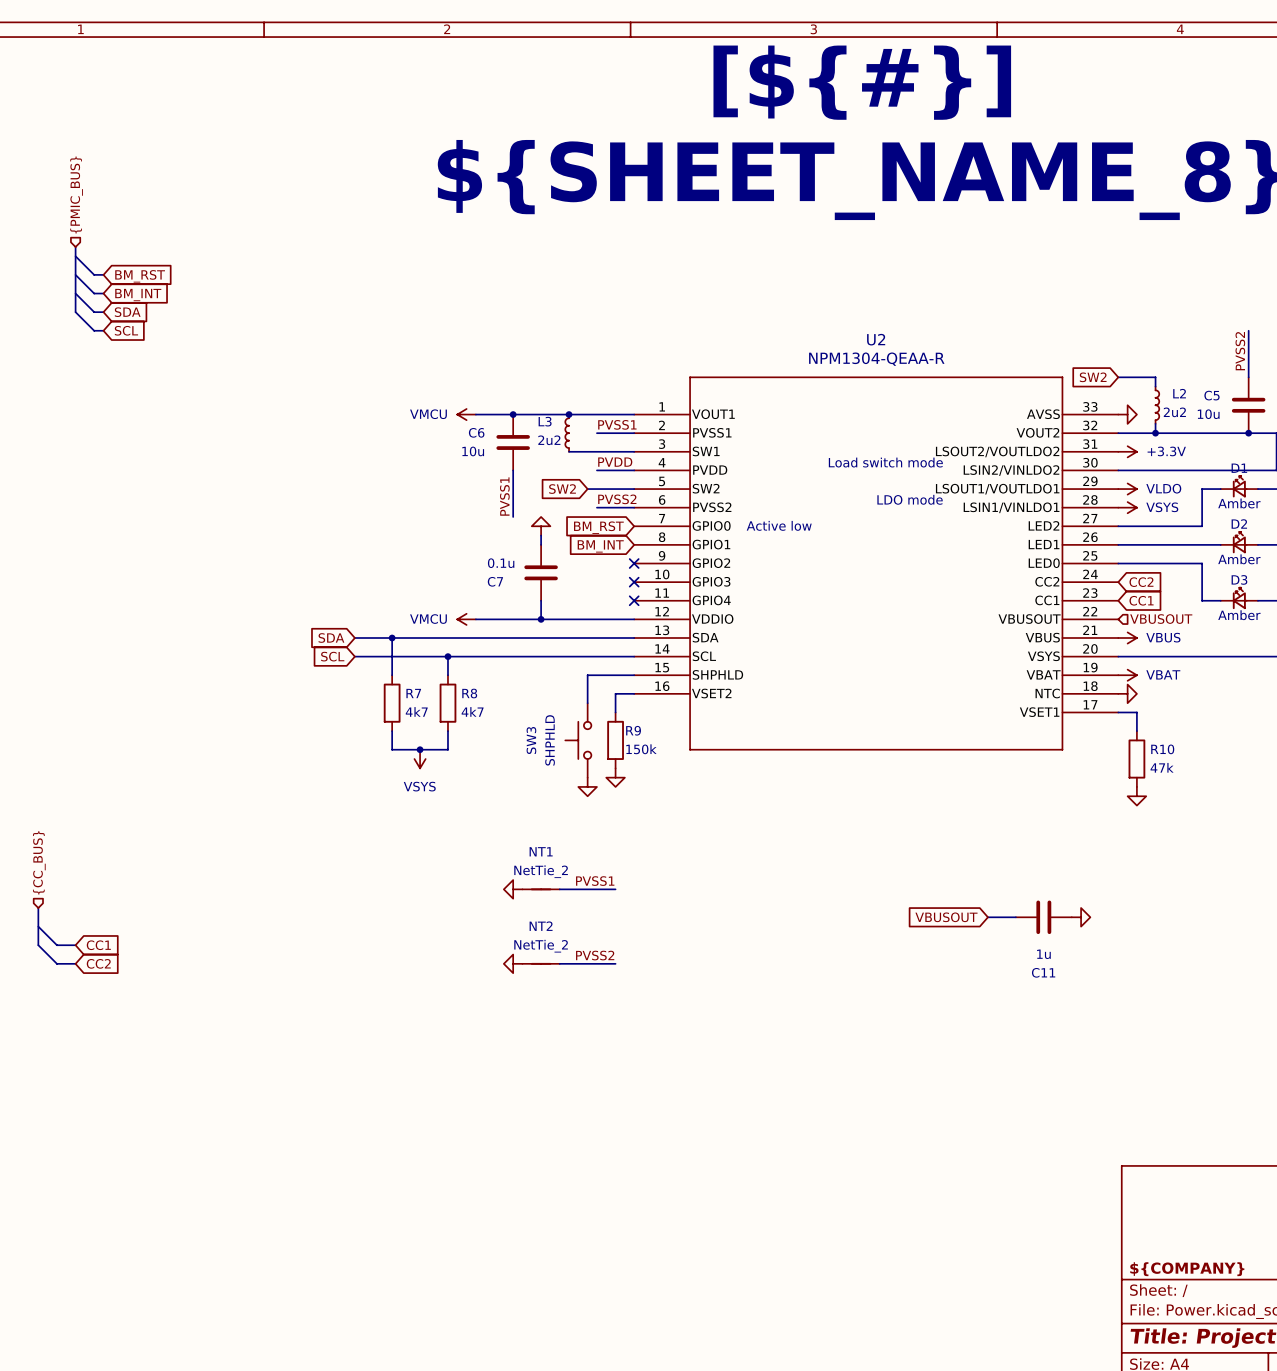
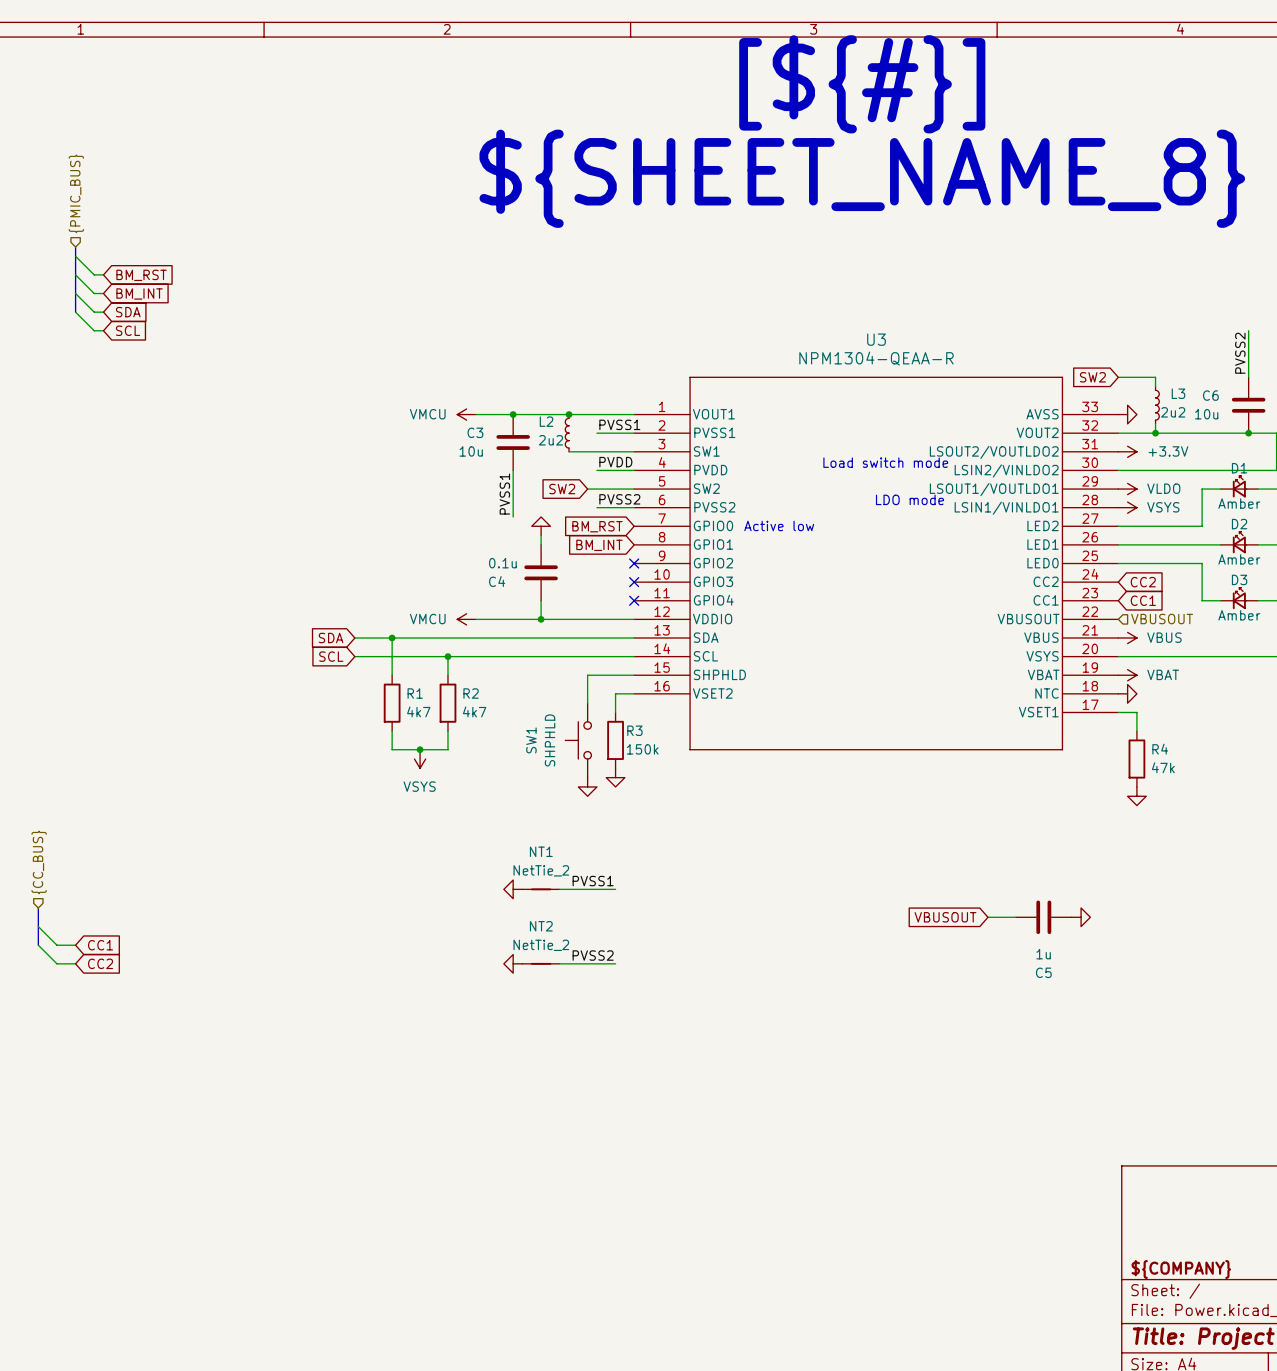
U2 name: U2 (876, 339) -> U3 (876, 339)
L2 name: L2 (1179, 393) -> L3 (1178, 393)
C5 name: C5 (1211, 395) -> C6 (1210, 395)
L3 name: L3 (545, 421) -> L2 (546, 421)
C6 name: C6 (476, 432) -> C3 (475, 432)
C7 name: C7 (495, 581) -> C4 (497, 581)
R7 name: R7 (413, 693) -> R1 (415, 693)
R8 name: R8 (469, 693) -> R2 (471, 693)
R9 name: R9 (633, 730) -> R3 (634, 730)
SW3 name: SW3 (531, 740) -> SW1 (531, 740)
R10 name: R10 (1162, 749) -> R4 (1160, 749)
C11 name: C11 (1043, 972) -> C5 (1043, 972)

